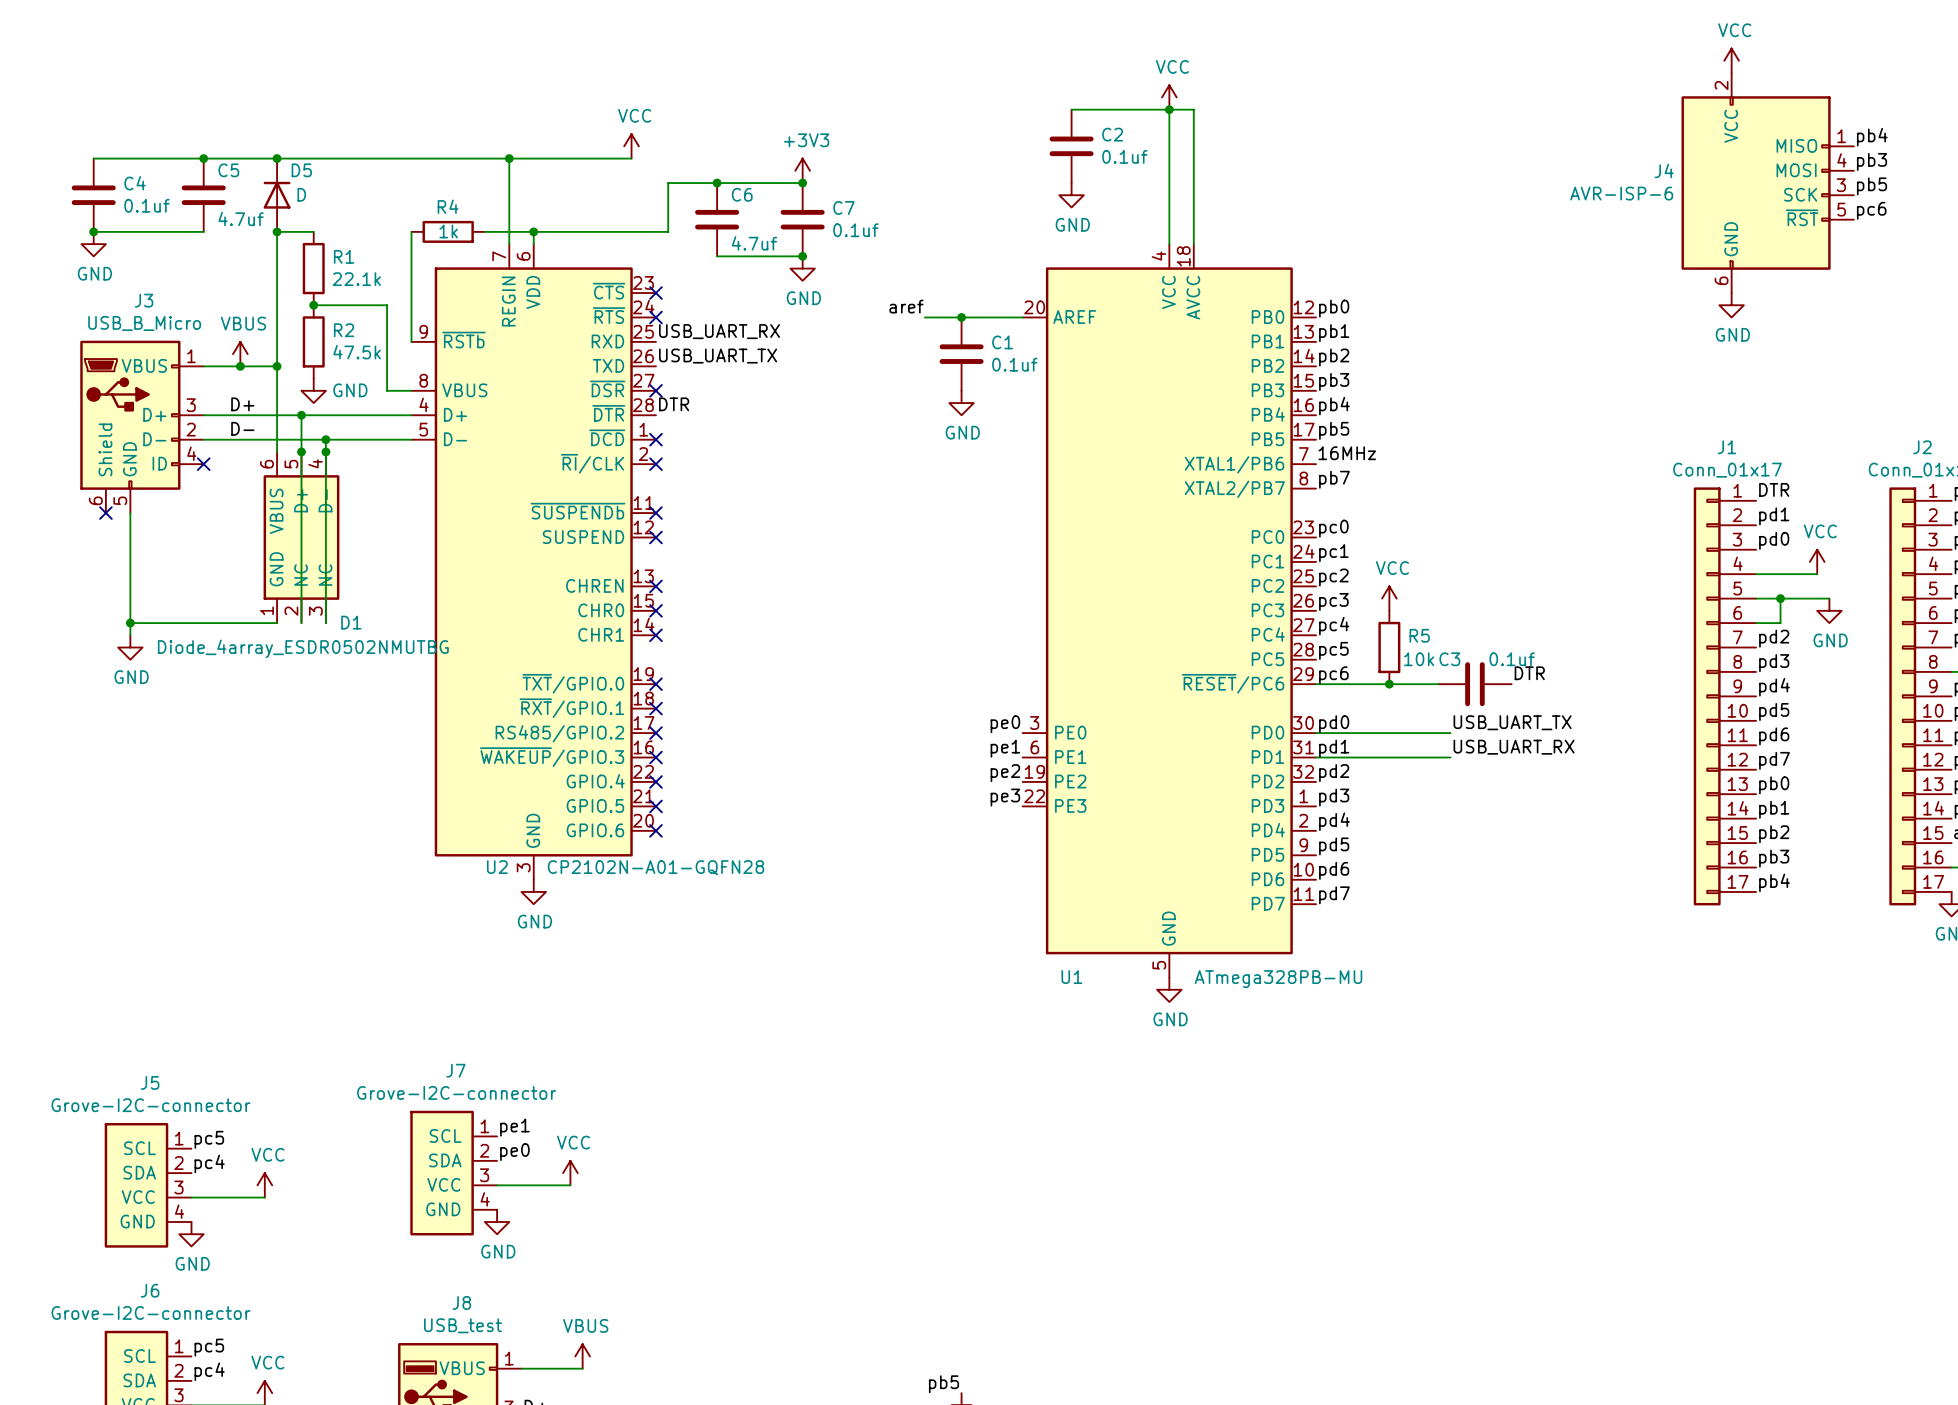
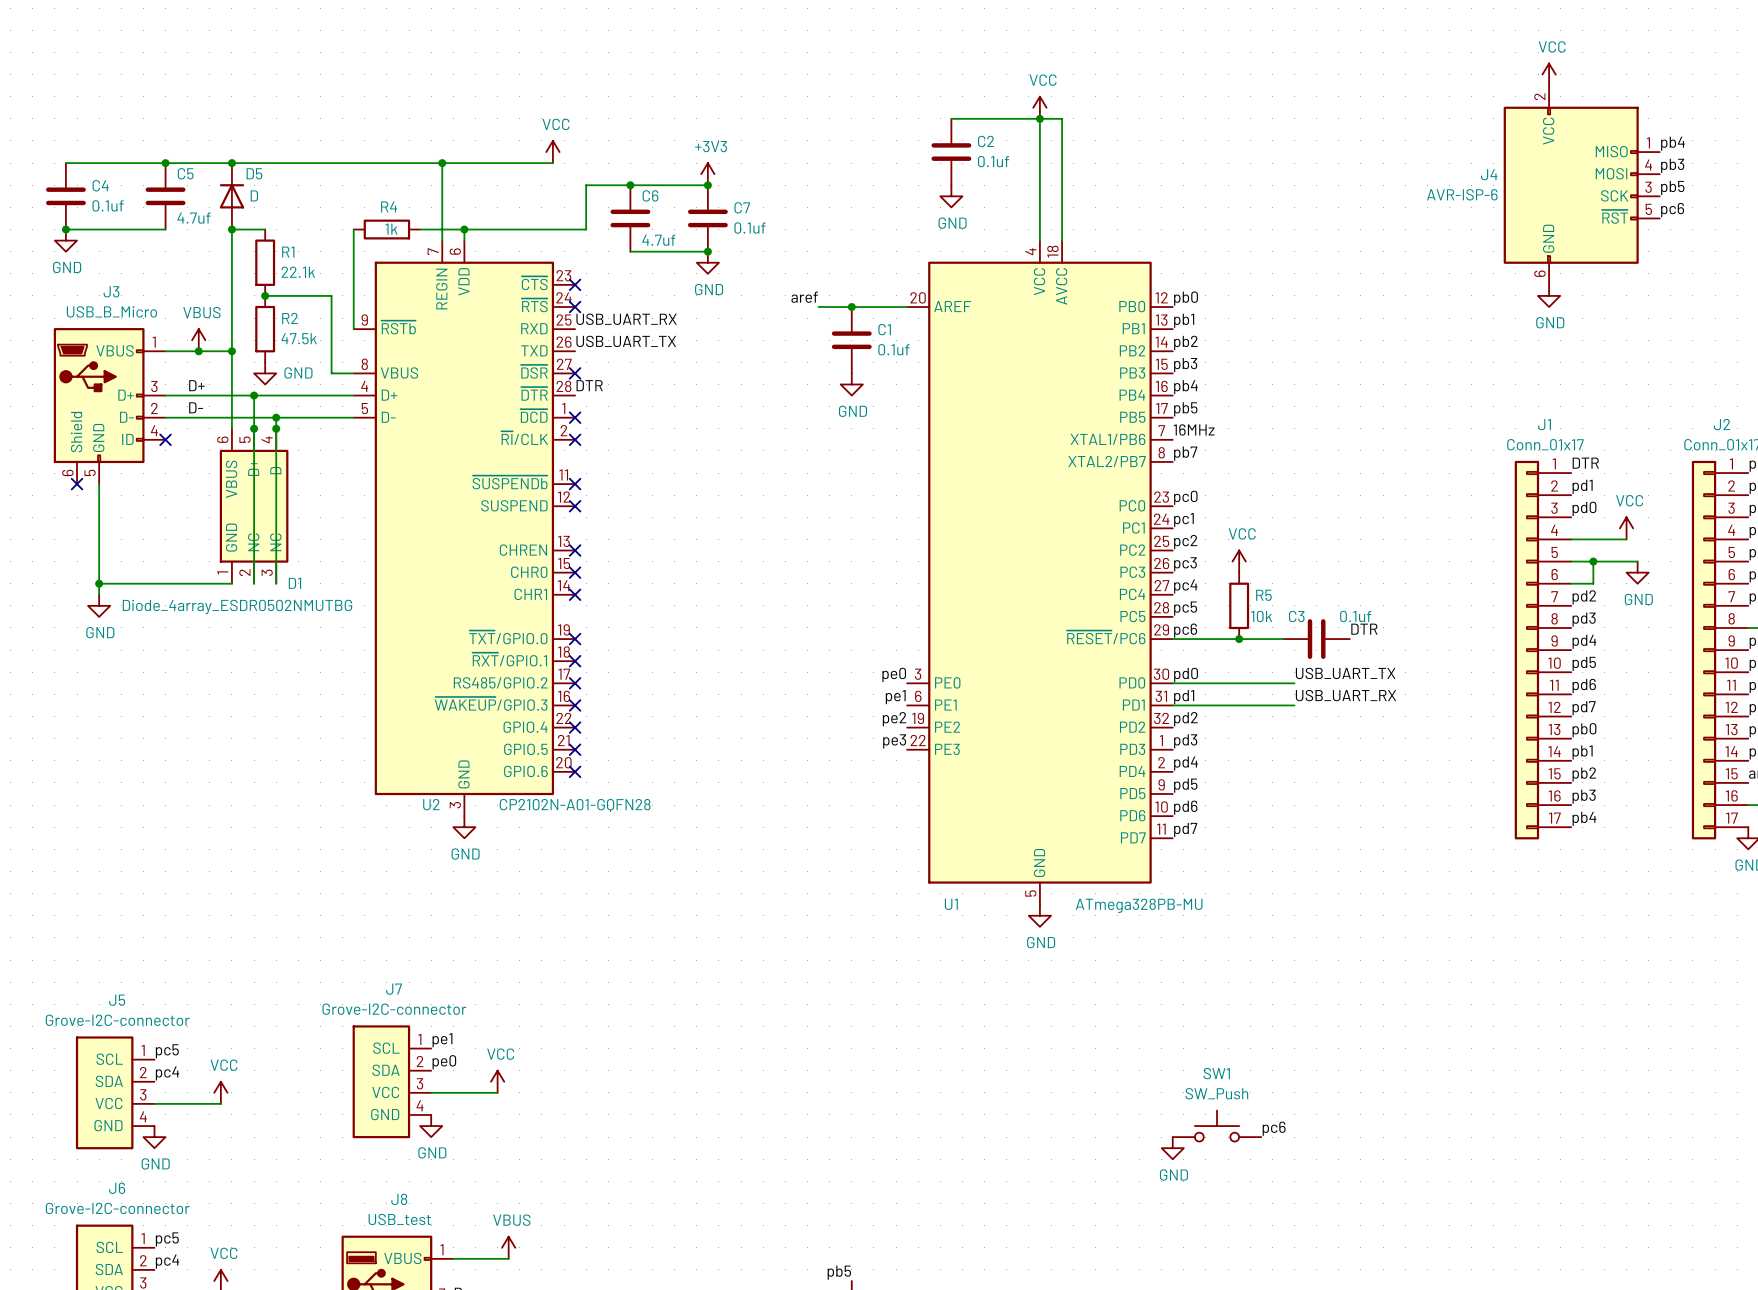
SW1: none -> SW_Push (1217, 1126)
label: none -> pc6 (1274, 1128)
power symbol: none -> GND (1172, 1148)

